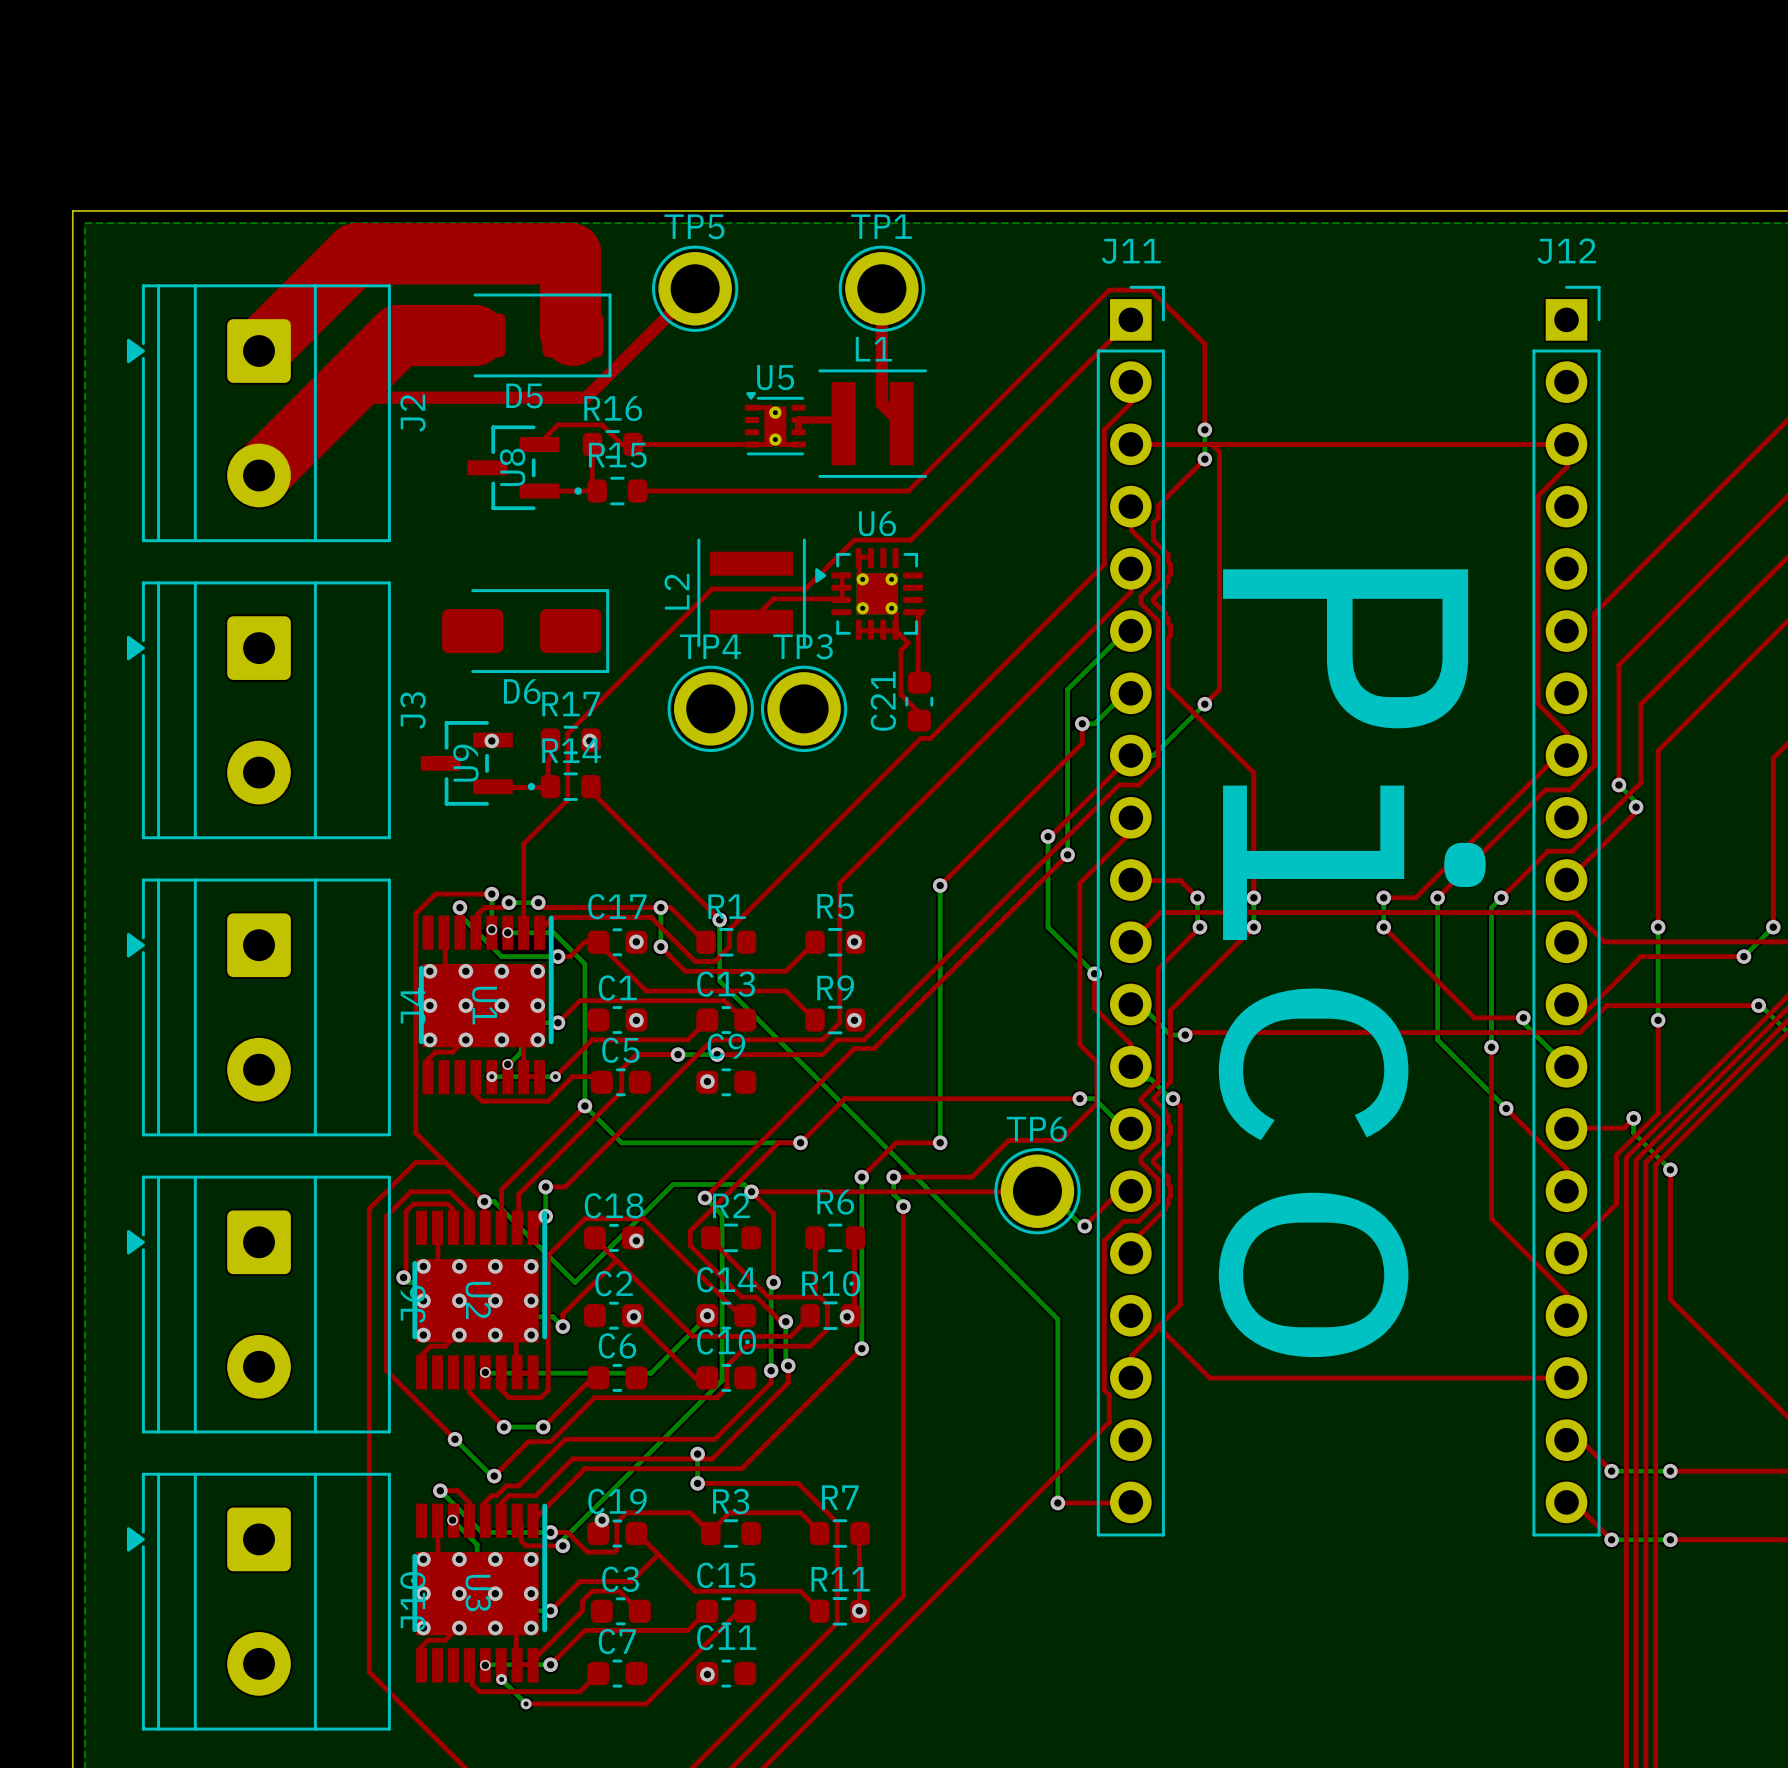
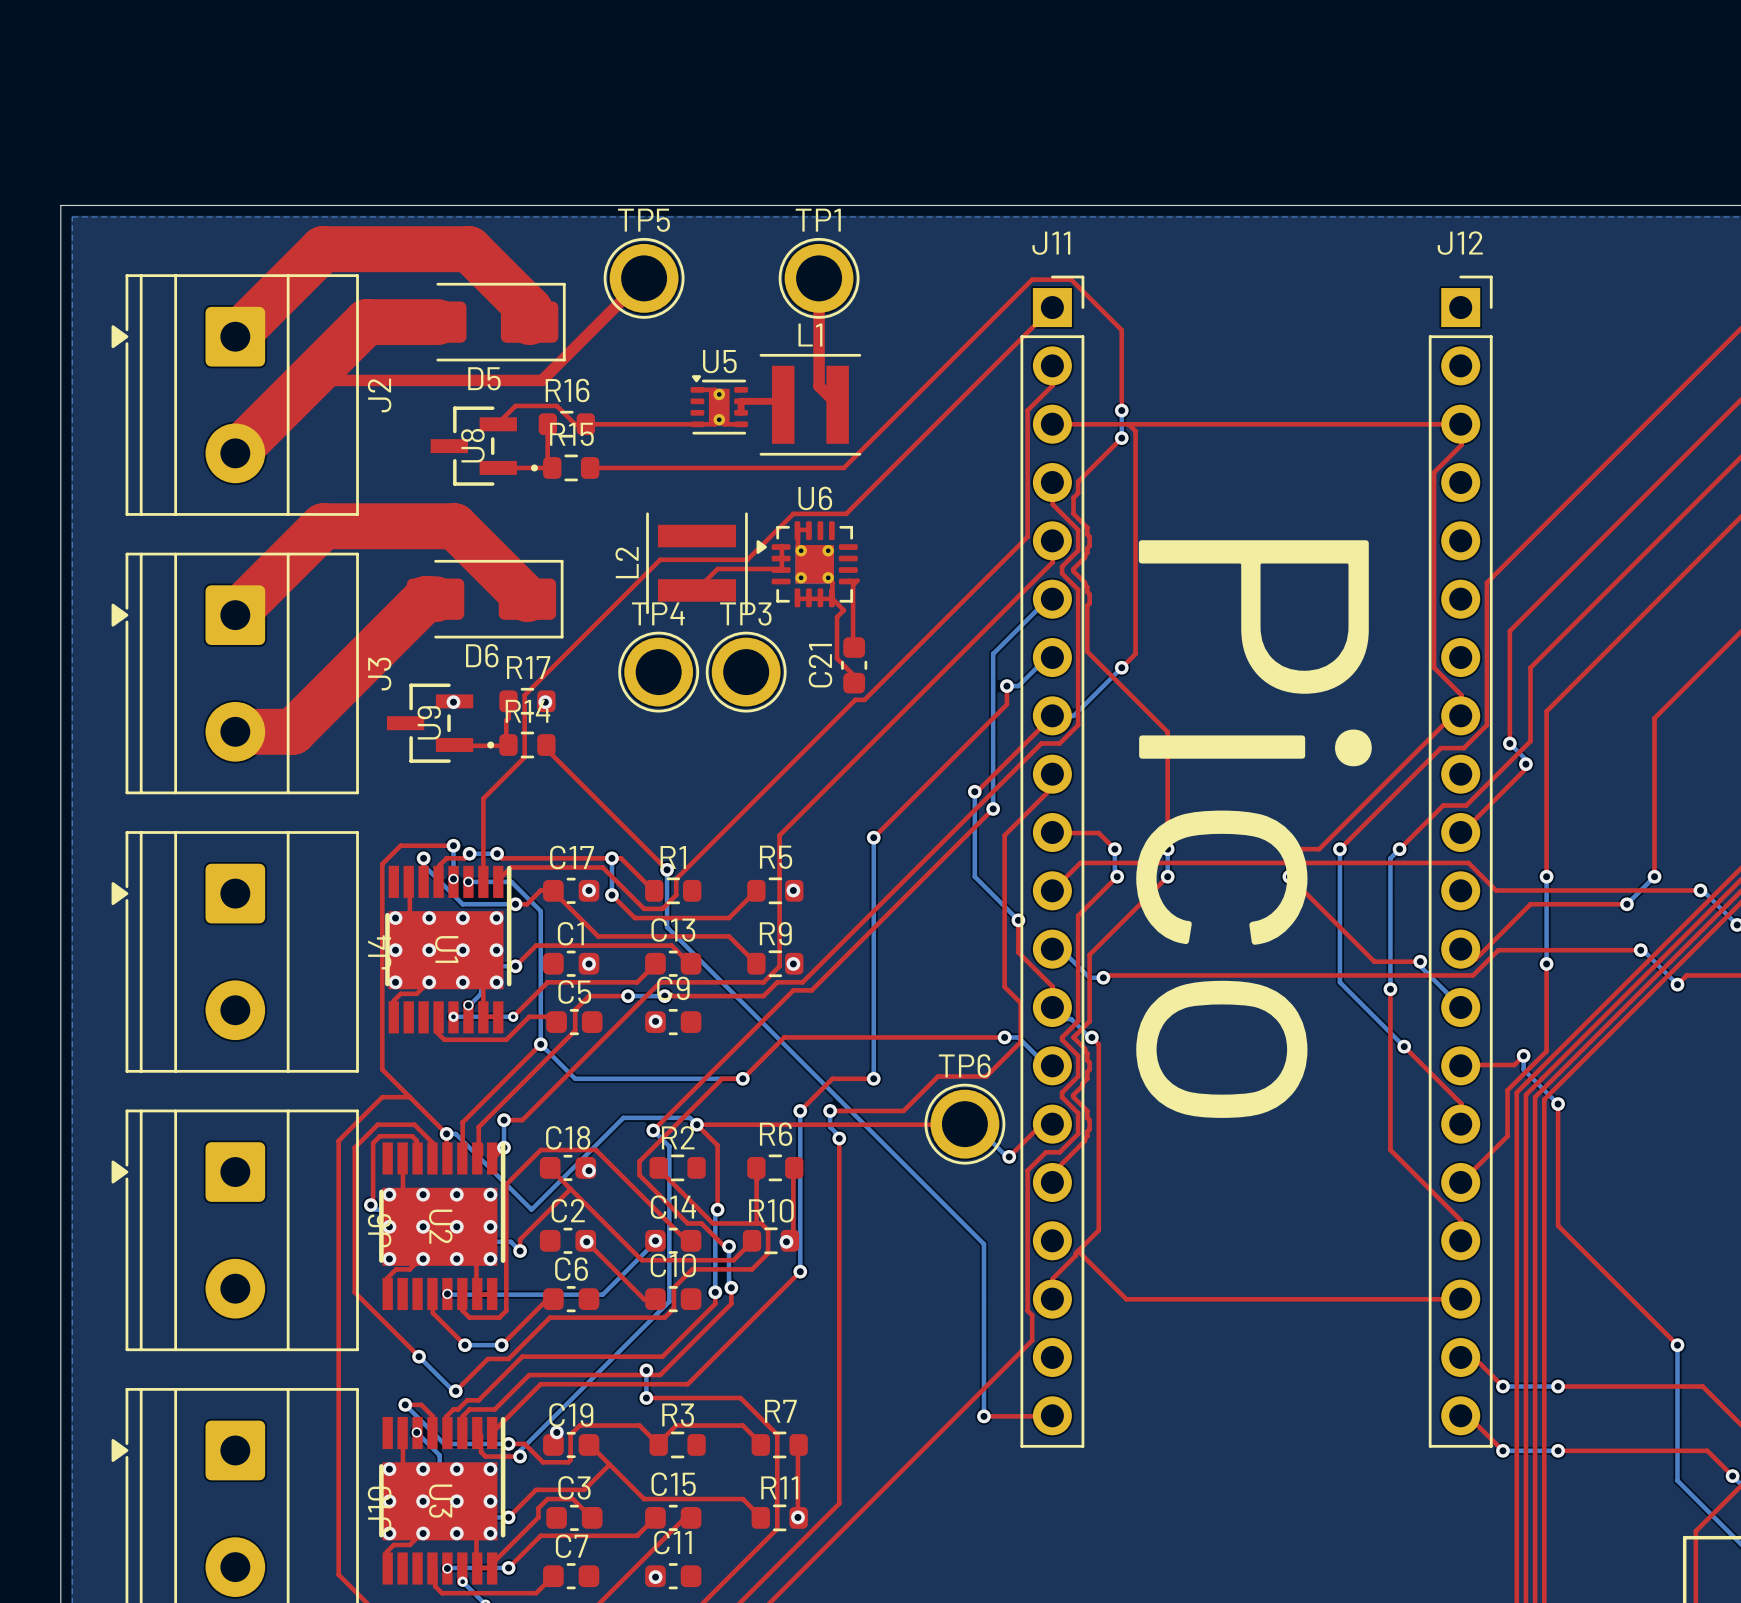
top track: (352, 257) (356, 253) (570, 253) (570, 333) (573, 335) -> (322, 249) (469, 249) (529, 309) (529, 322)
top track width: thick (352, 257) (259, 351) -> thin (322, 249) (235, 336)
top track width: thick (475, 335) (399, 335) (259, 475) -> thin (437, 322) (366, 322) (235, 453)
top track: none -> (435, 599) (425, 599) (292, 731) (235, 731)
top track: none -> (527, 599) (454, 526) (323, 526) (235, 615)

